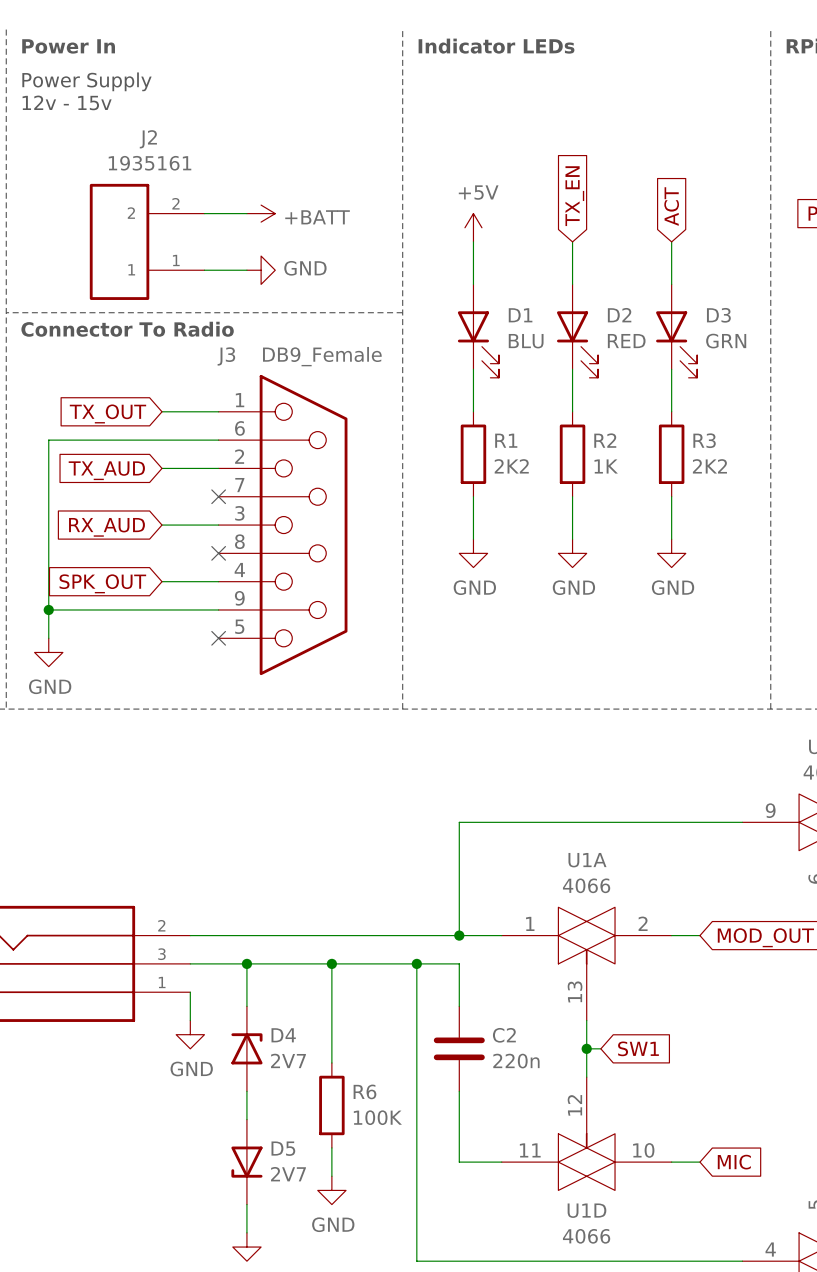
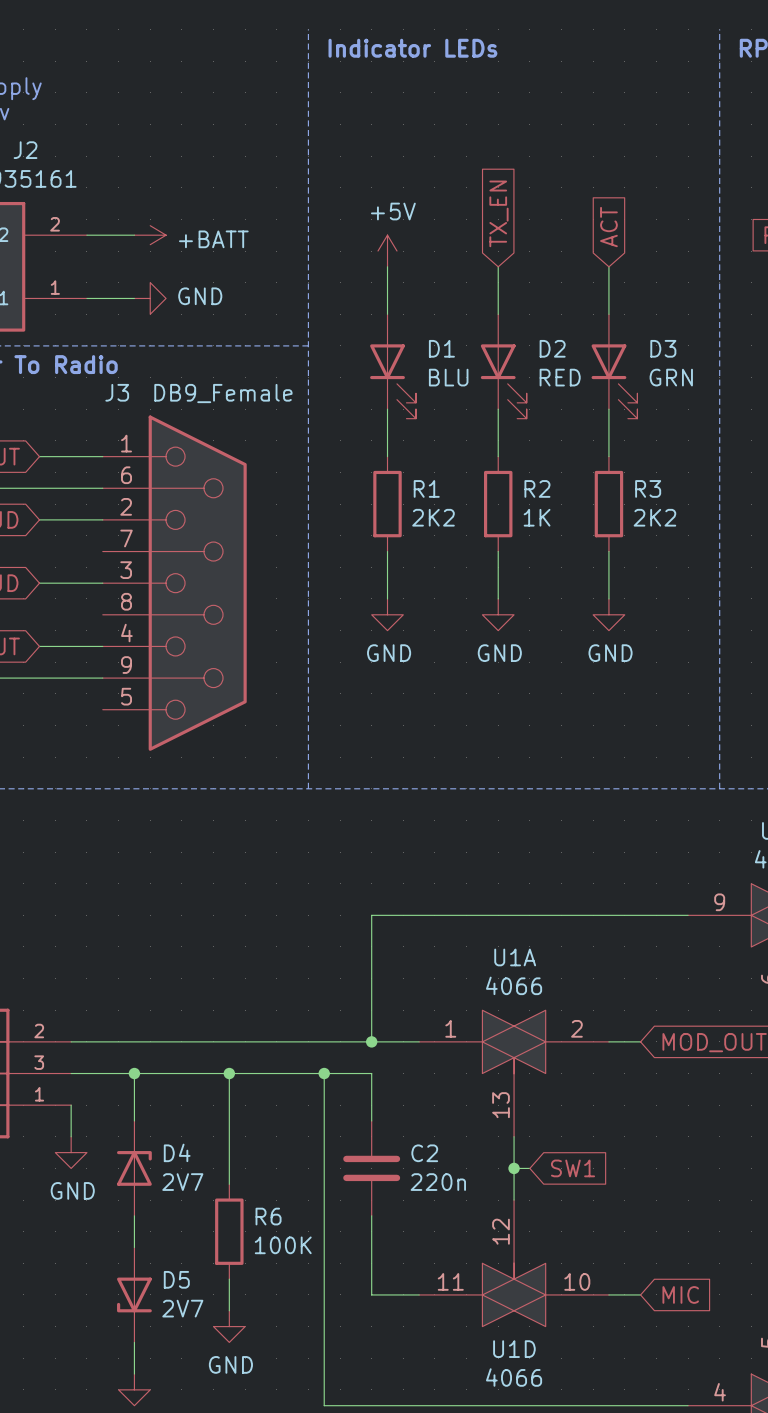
no-connect mark: (218, 496) -> none
no-connect mark: (218, 553) -> none
no-connect mark: (218, 638) -> none

